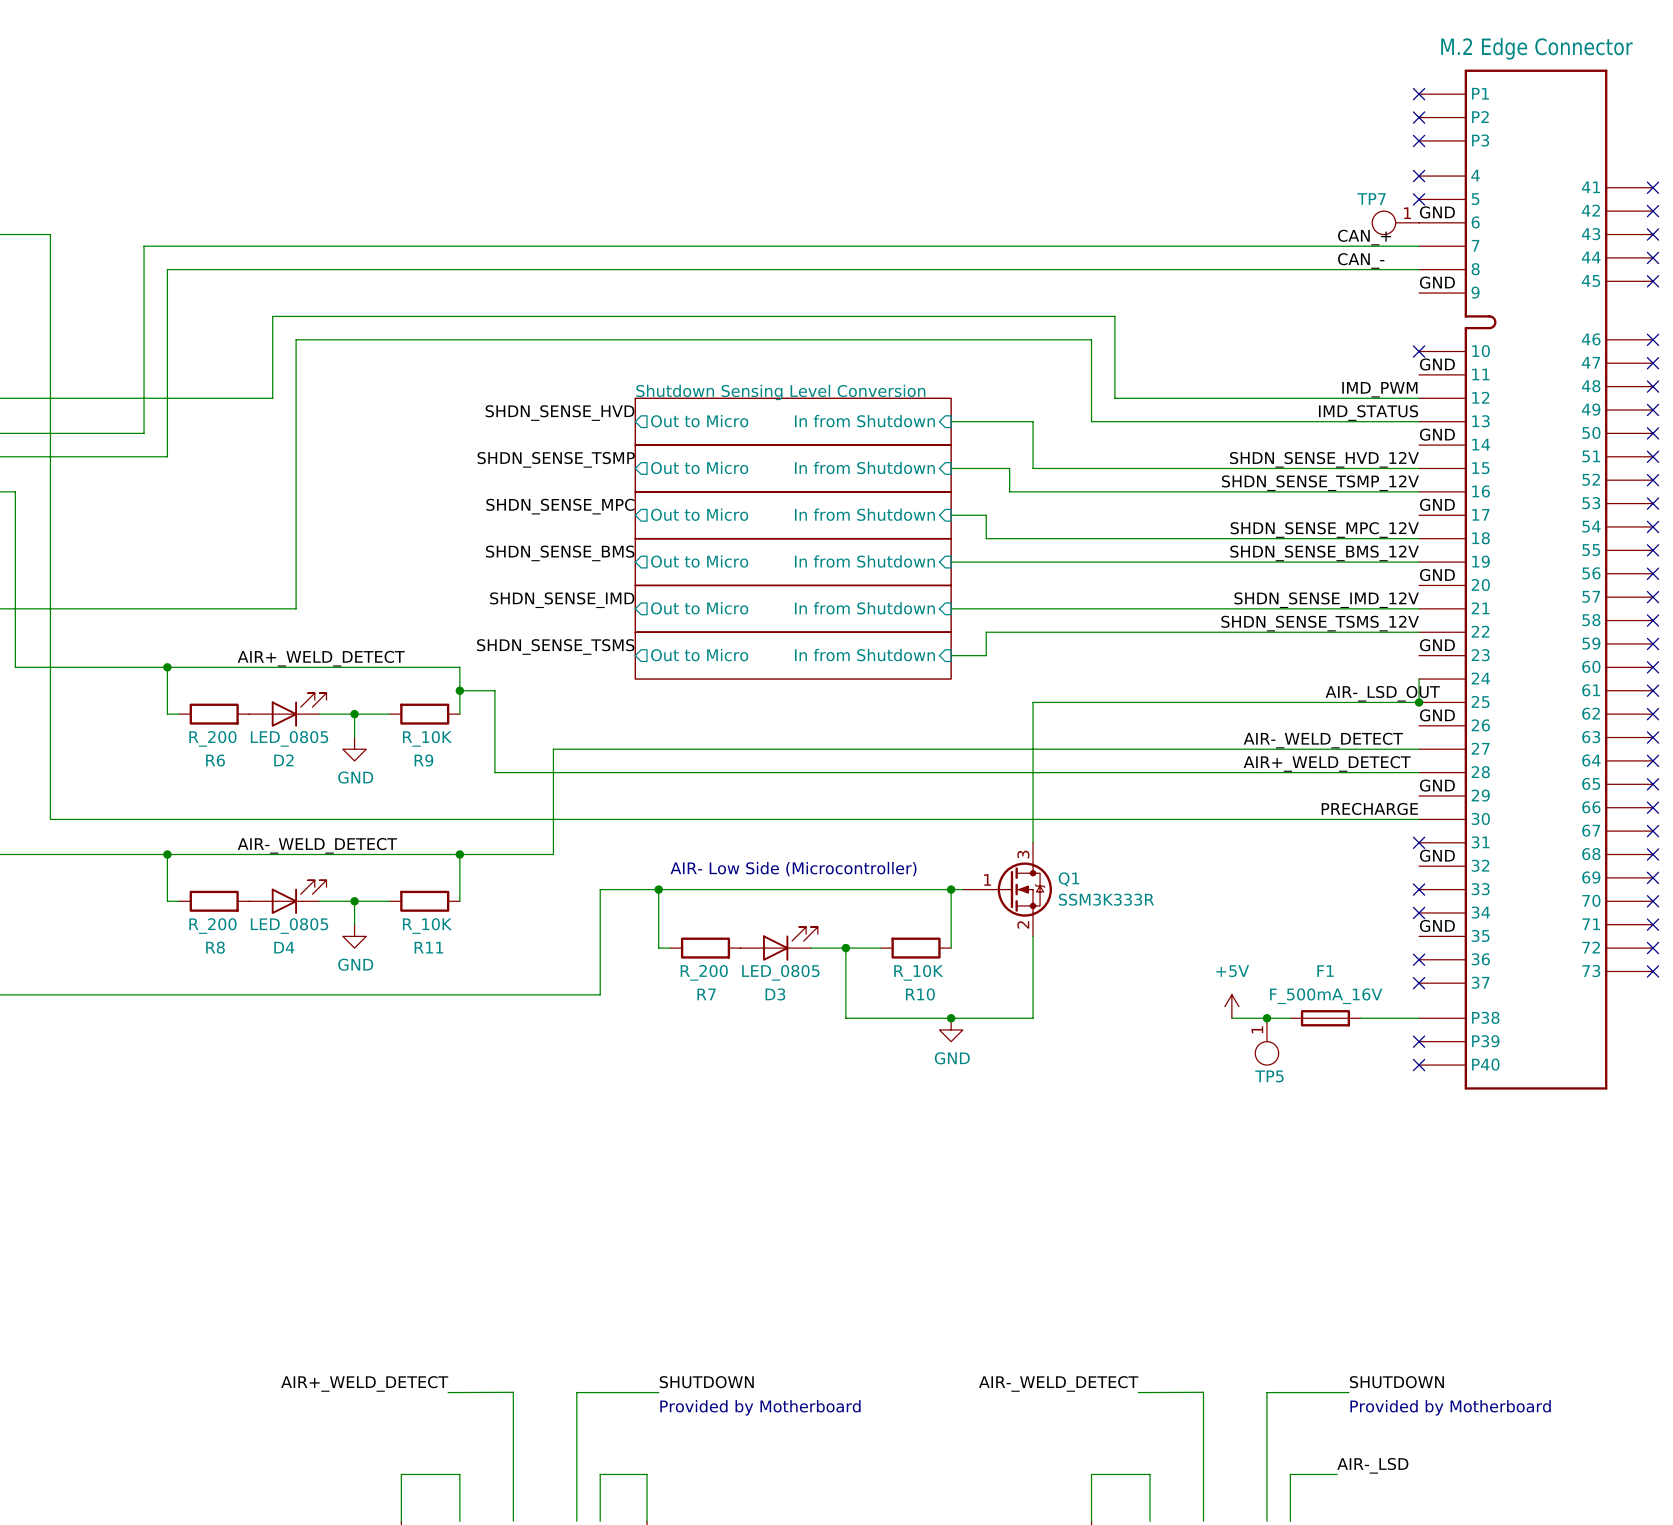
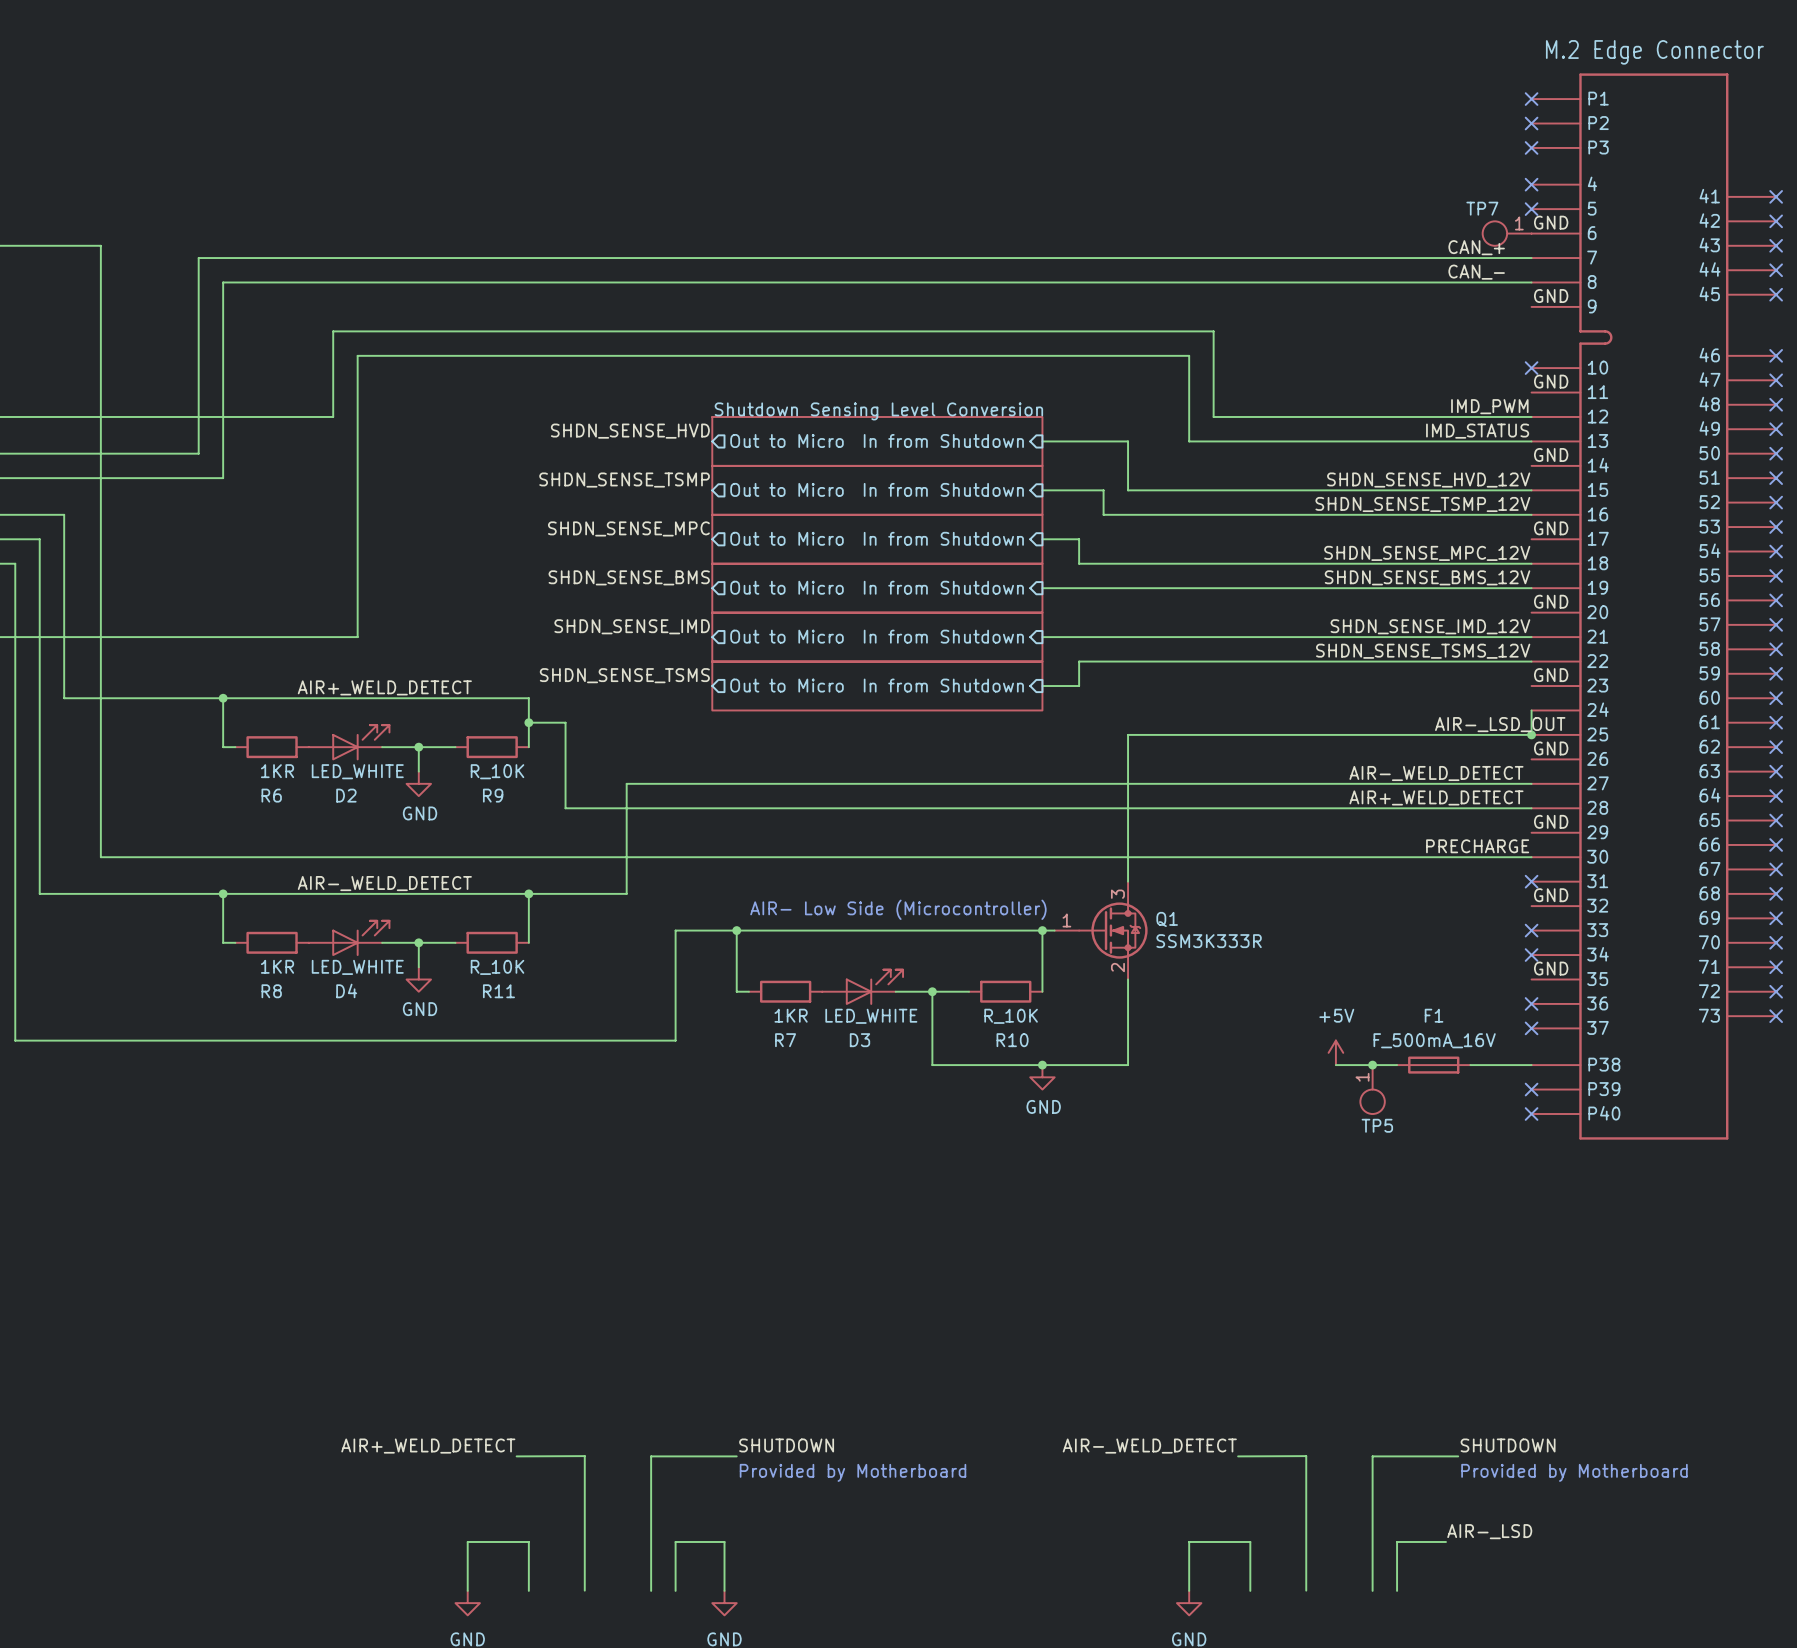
R6 value: R_200 (212, 738) -> 1KR (277, 771)
D2 value: LED_0805 (289, 738) -> LED_WHITE (357, 771)
Q1 symbol: [962, 842, 1052, 937] -> [1054, 881, 1148, 980]
R8 value: R_200 (212, 926) -> 1KR (277, 966)
D4 value: LED_0805 (289, 926) -> LED_WHITE (357, 967)
R7 value: R_200 (704, 972) -> 1KR (791, 1015)
D3 value: LED_0805 (780, 972) -> LED_WHITE (871, 1016)

